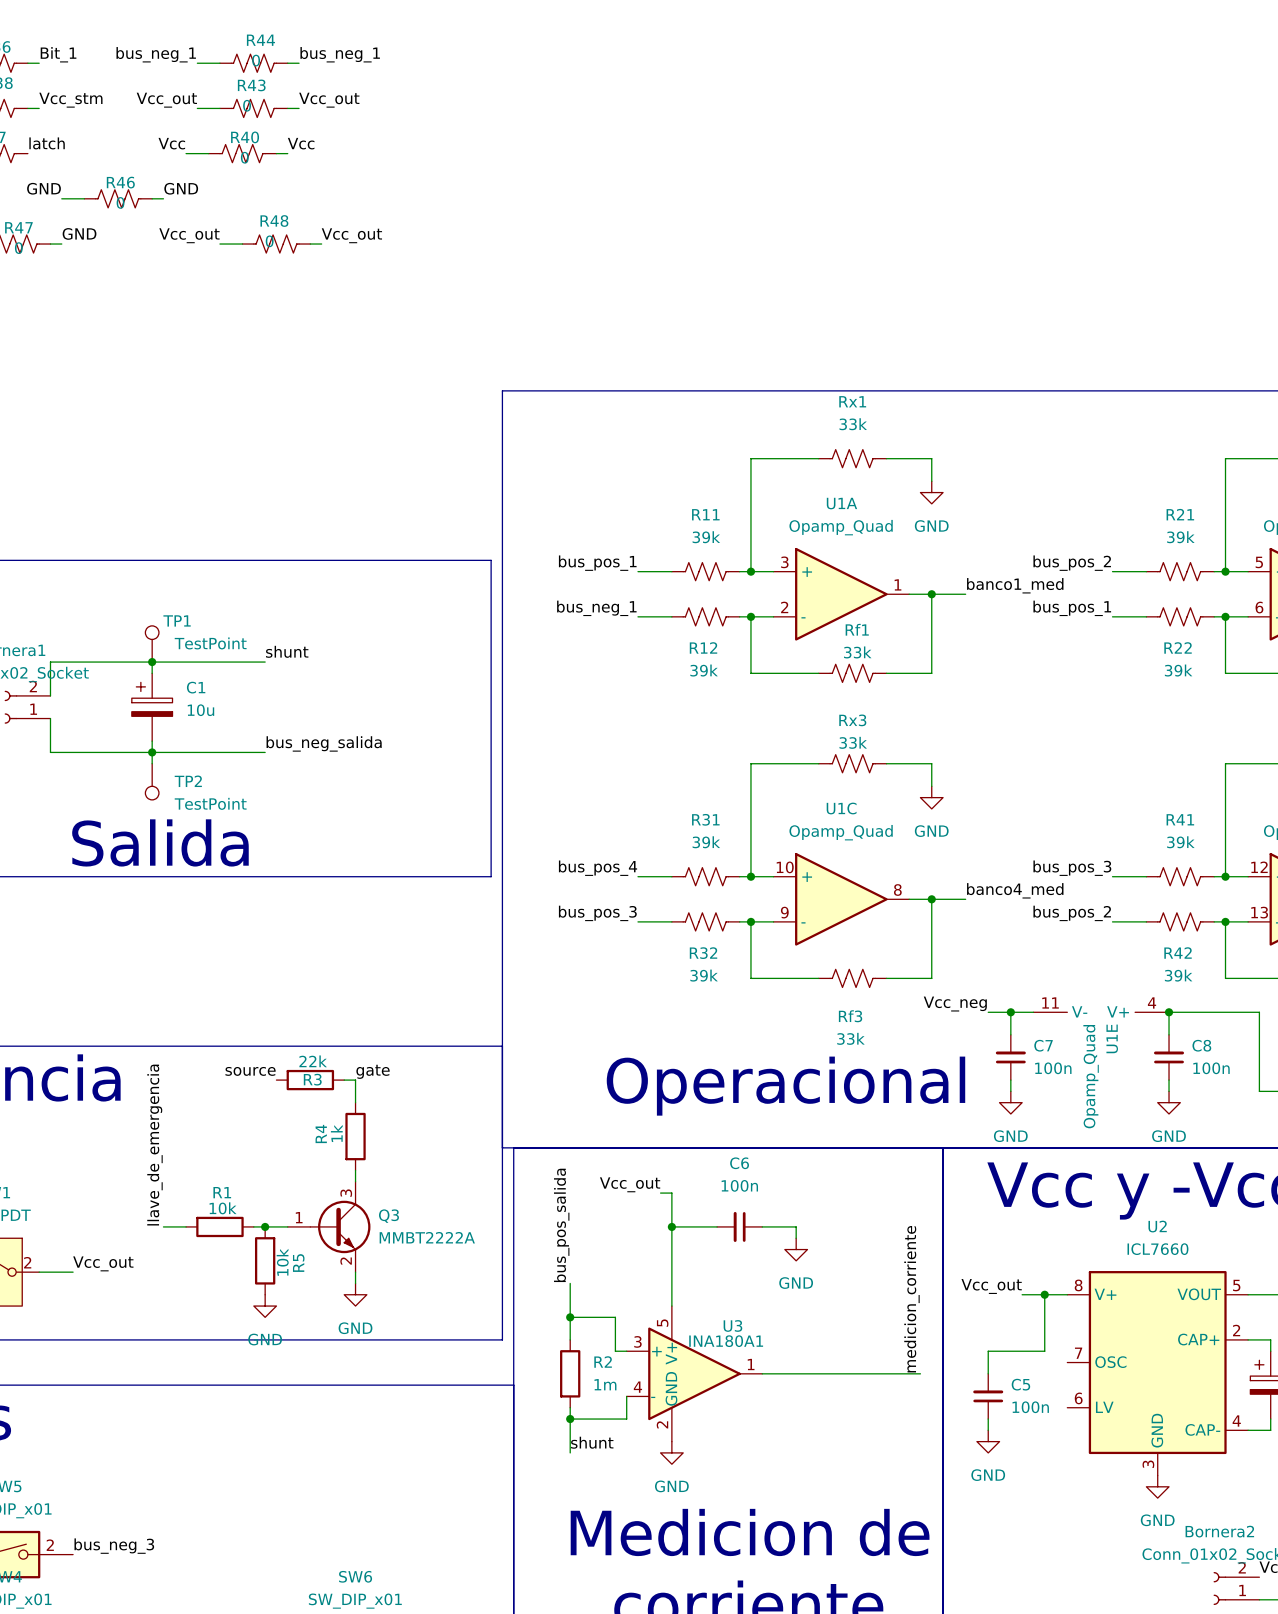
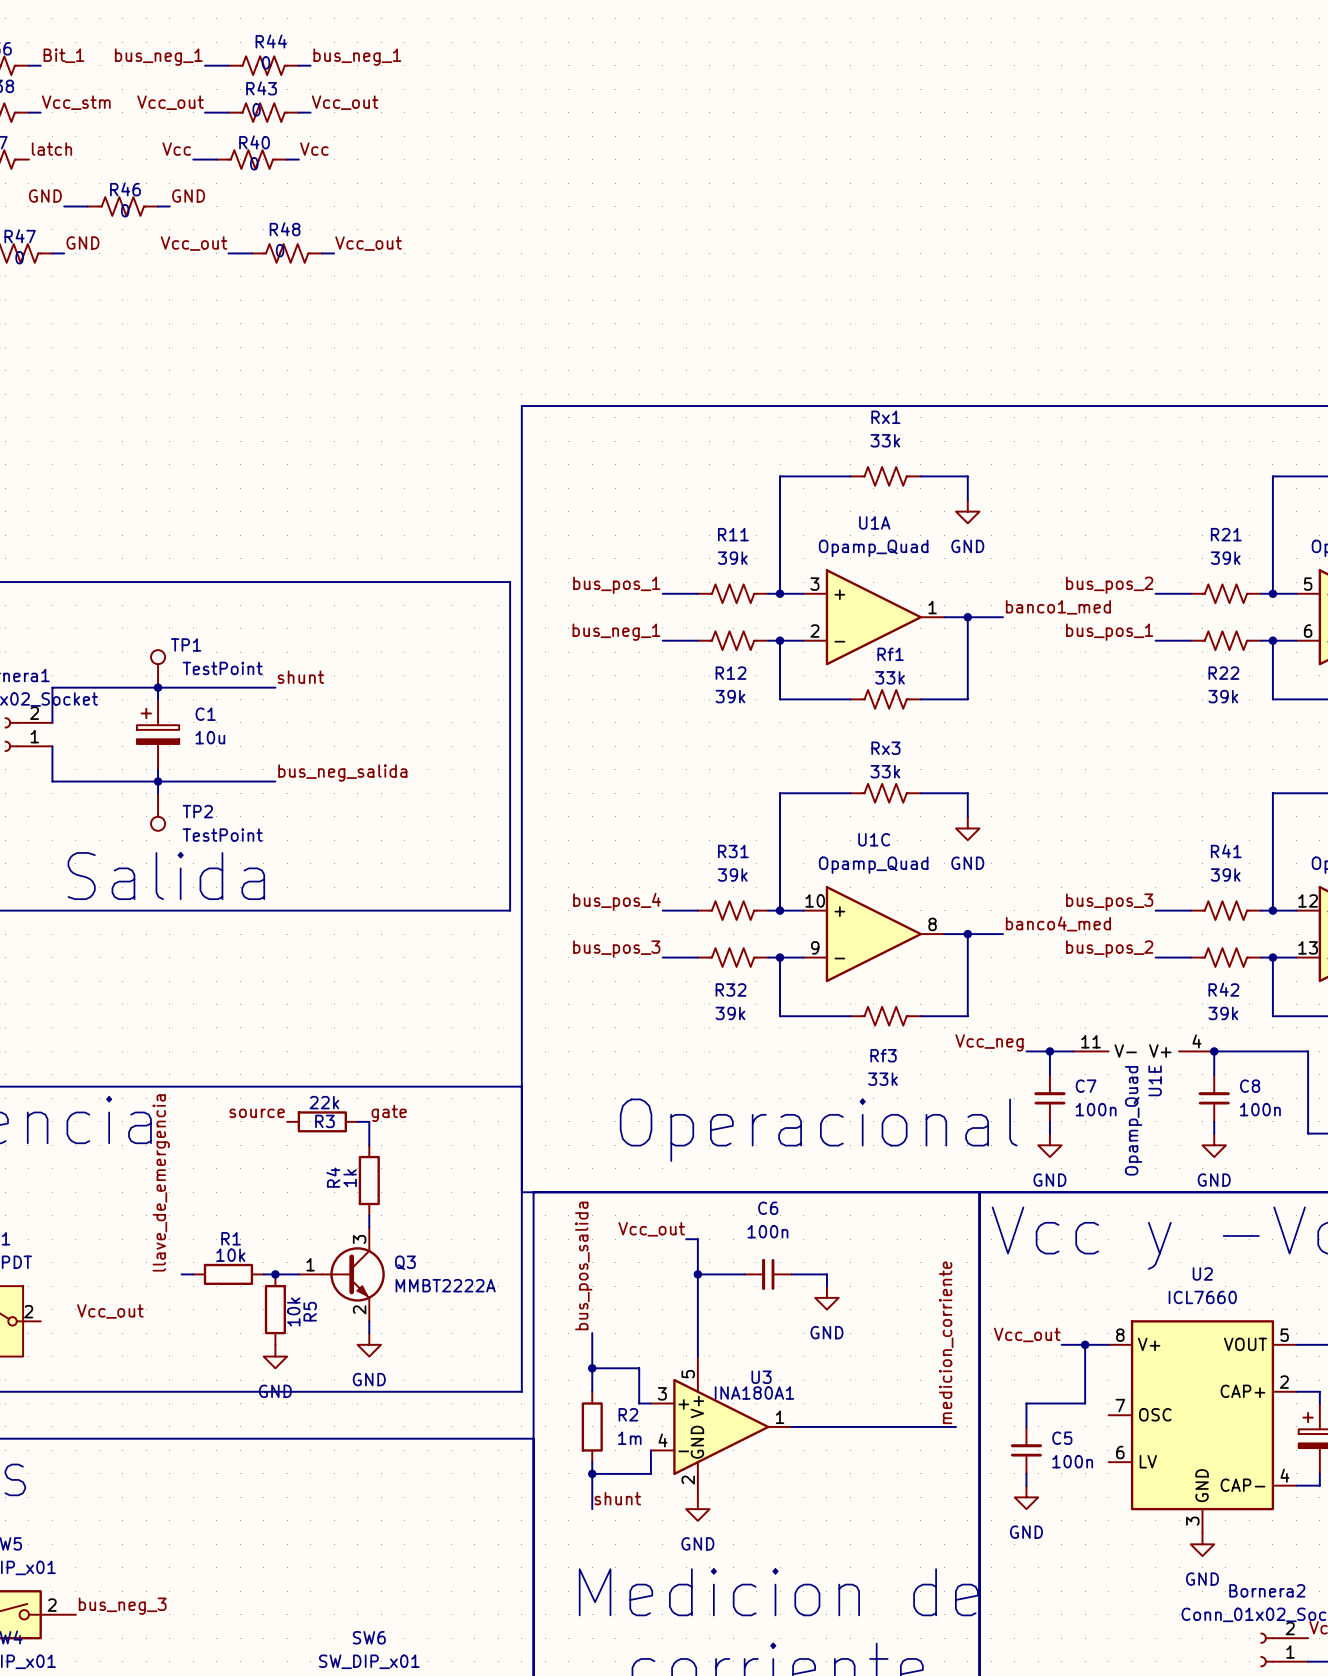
wire: (163, 1226) (174, 1226) -> none
wire: (39, 1272) (73, 1272) -> none

